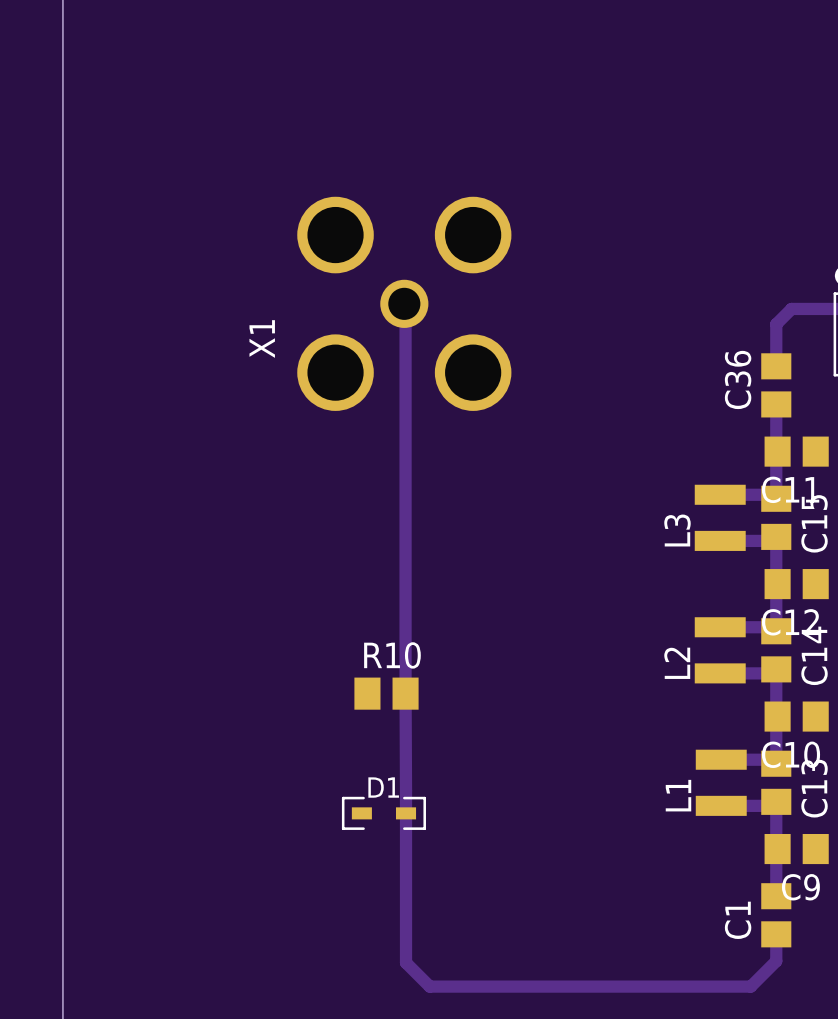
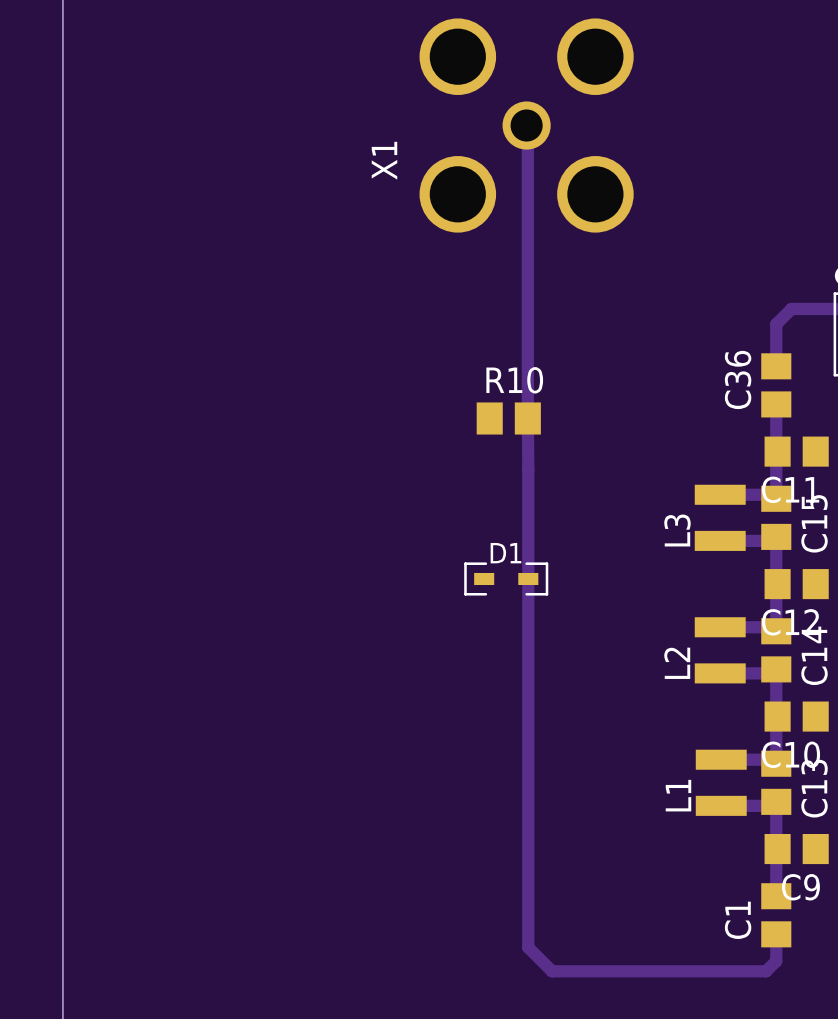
track: (404, 303) (406, 962) (429, 986) (750, 986) (766, 971) -> (526, 125) (527, 124) (528, 947) (552, 971) (766, 971)
X1 position: (404, 303) -> (526, 125)
R10 position: (386, 693) -> (508, 418)
D1 position: (383, 813) -> (506, 578)

